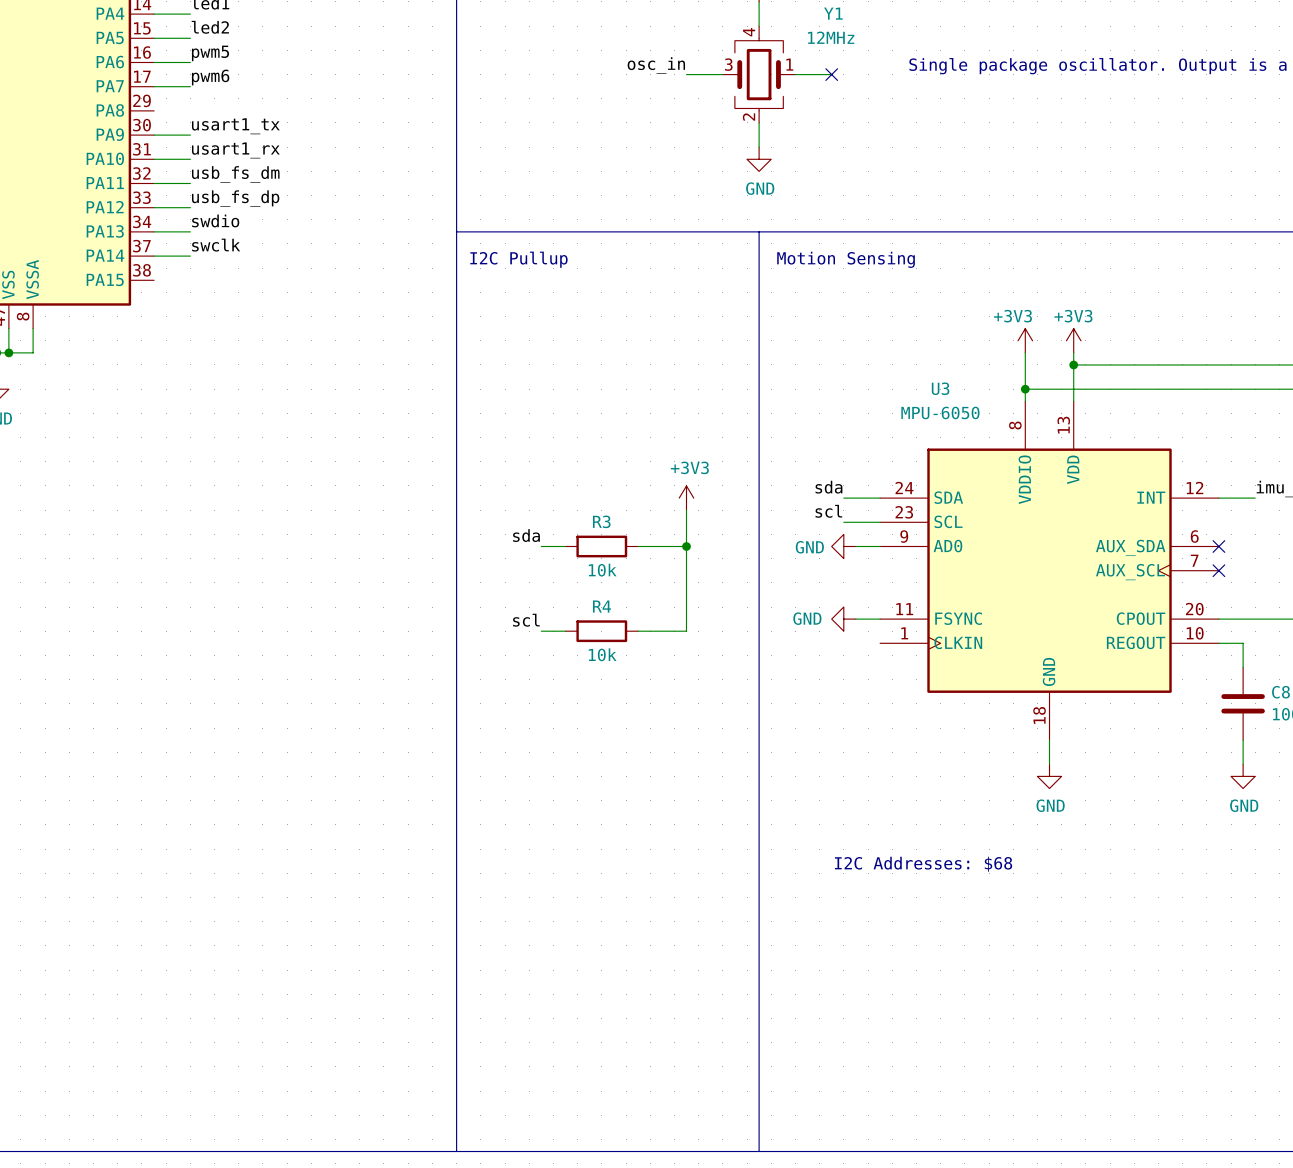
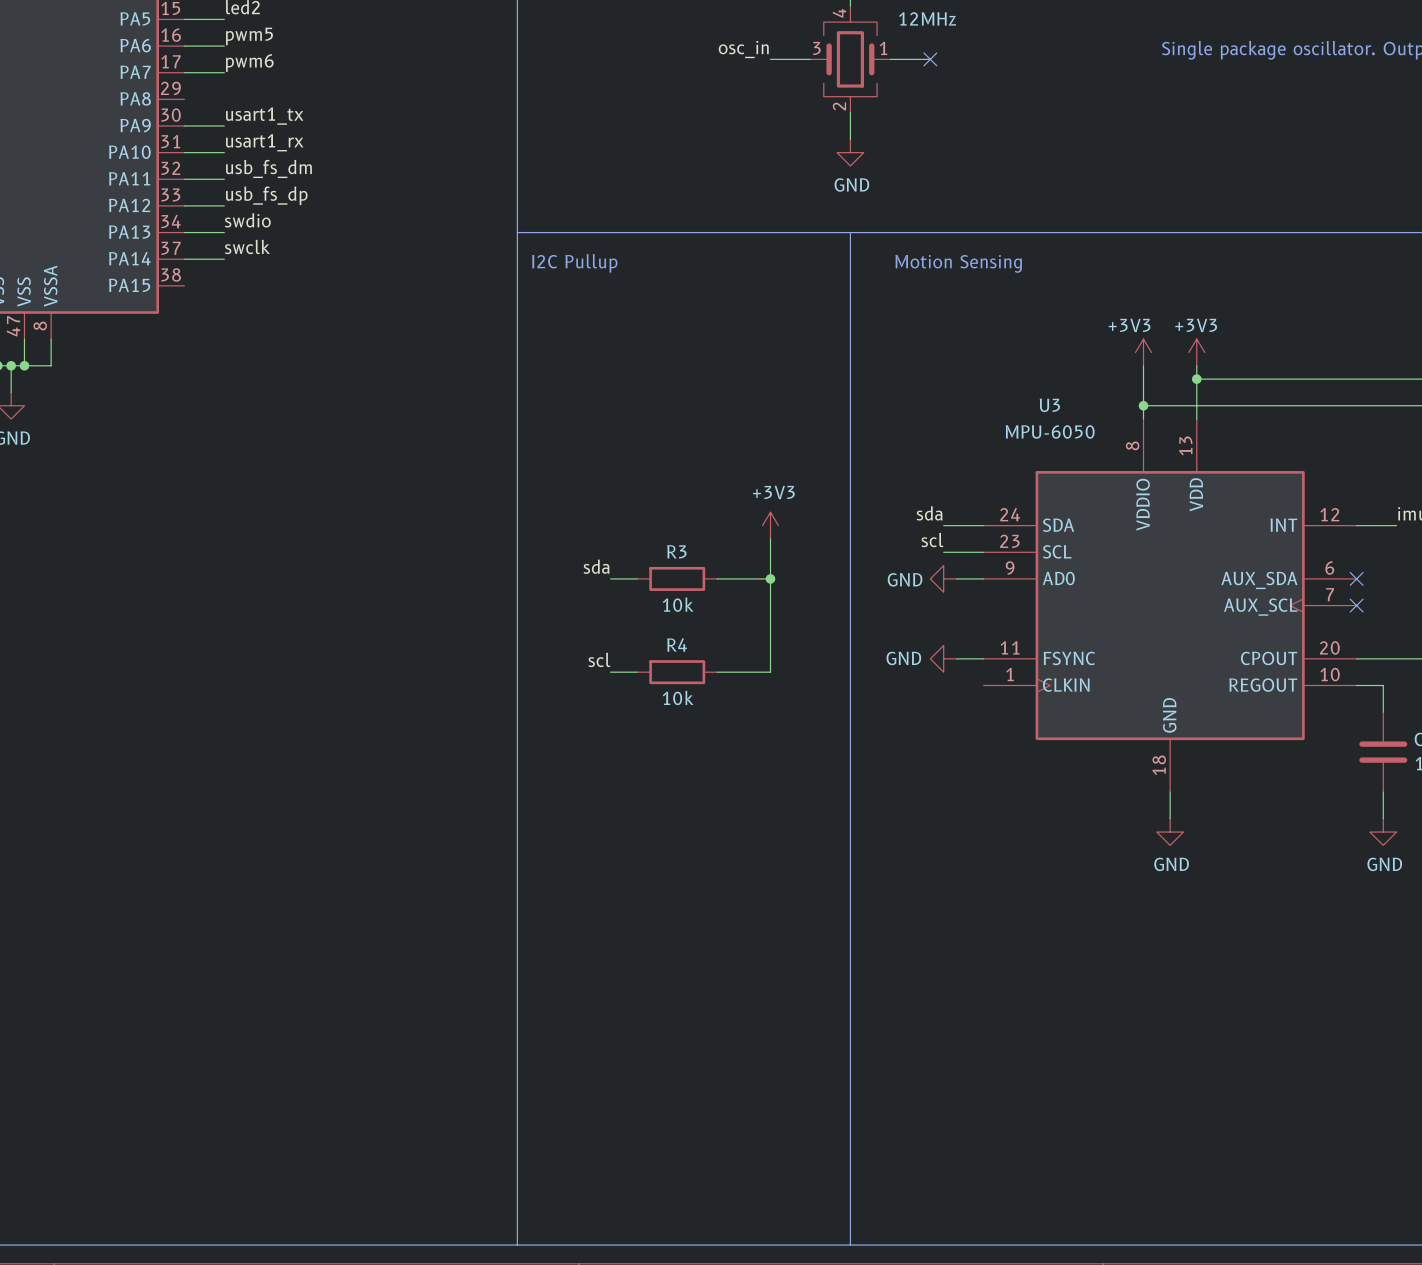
text: I2C Addresses: $68 (923, 864) -> none

